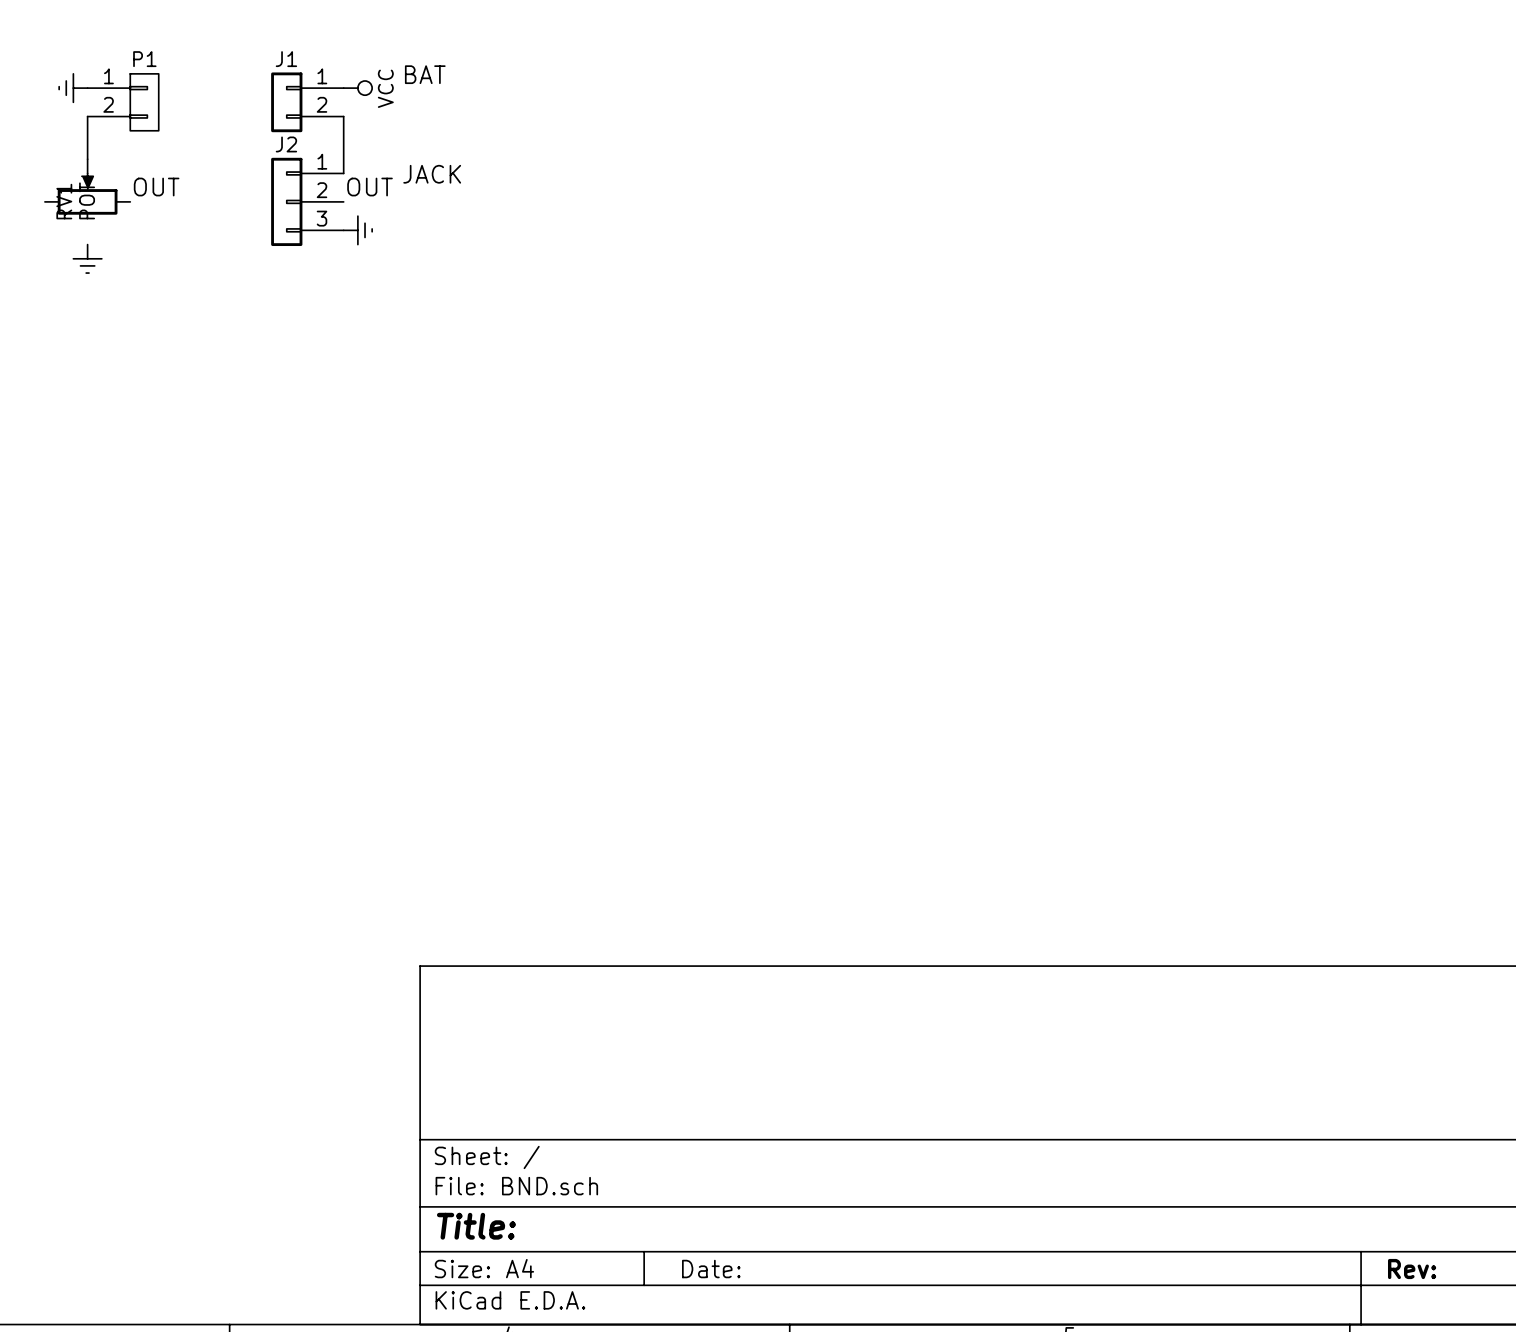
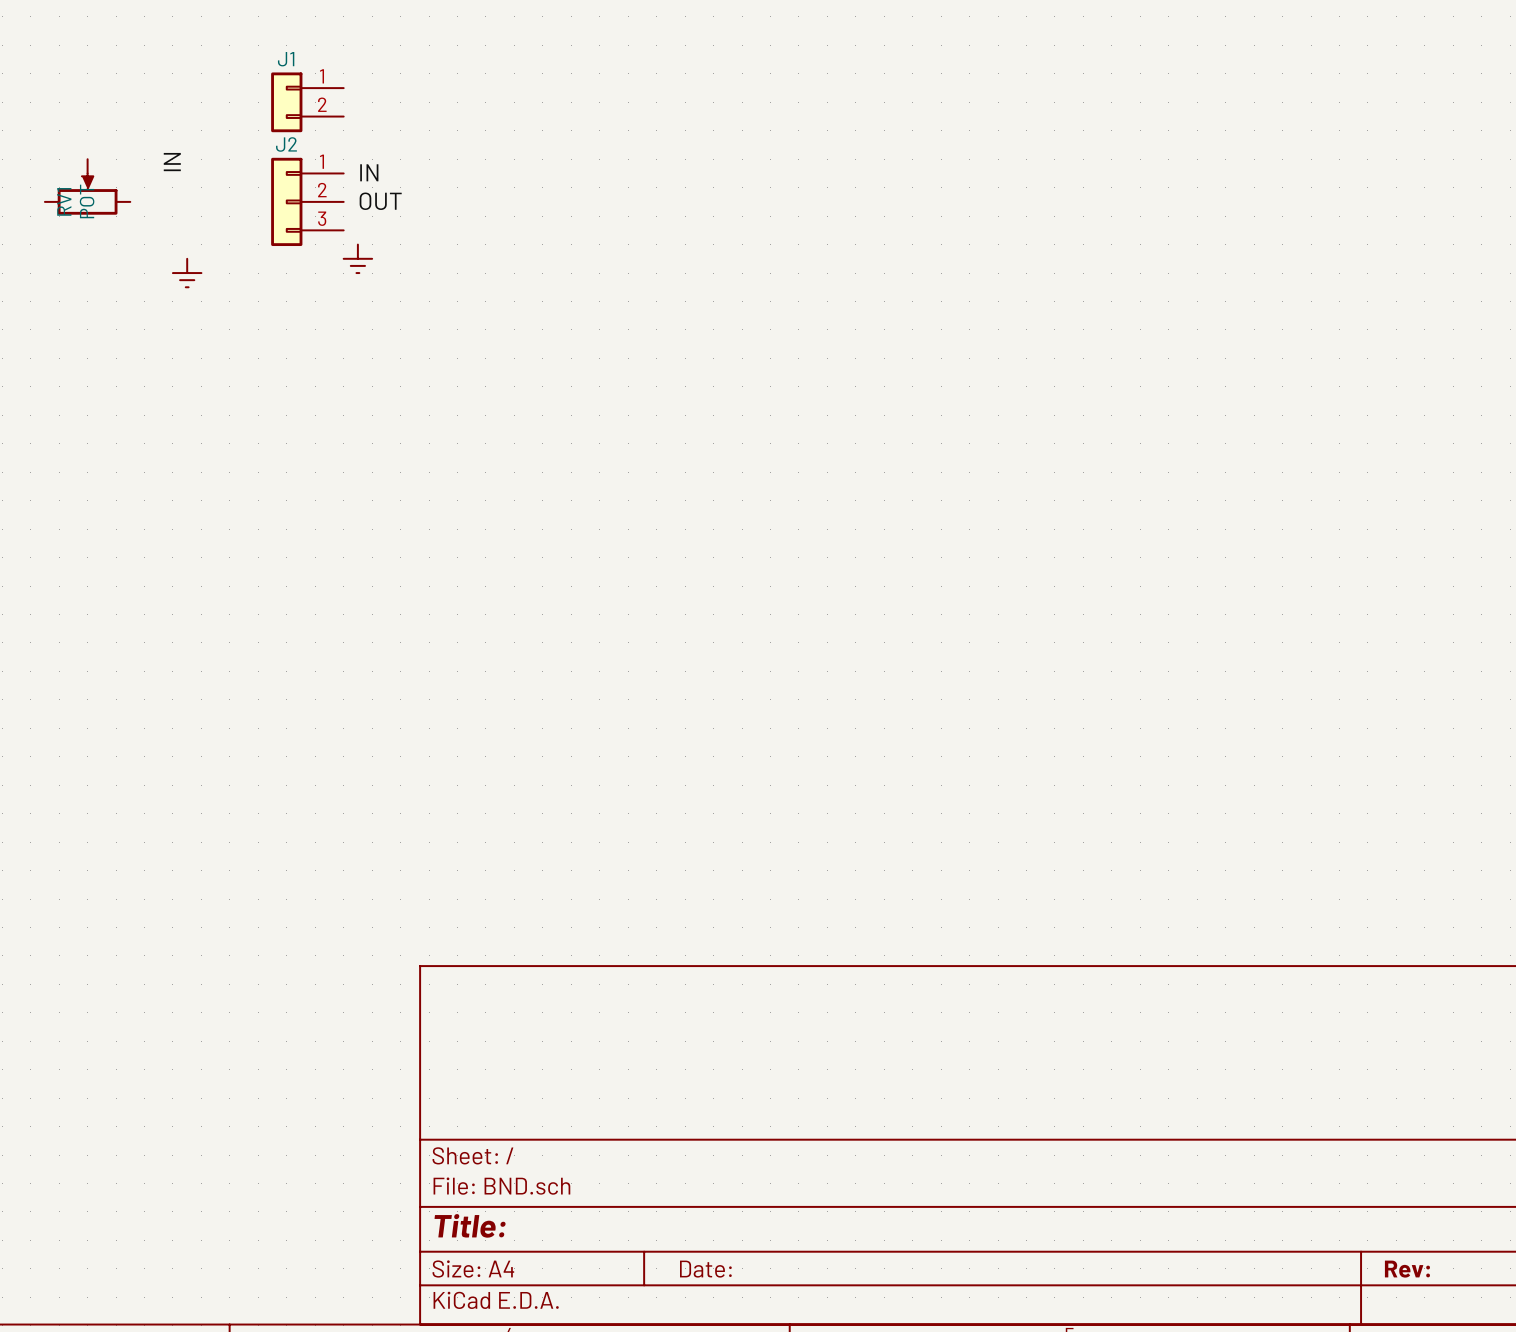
text: BAT (425, 74) -> none
power symbol: (73, 88) -> none
power symbol: VCC (357, 88) -> none
P1: (123, 102) -> none
wire: (87, 116) (87, 159) -> none
wire: (343, 116) (343, 173) -> none
label: none -> IN (172, 162)
label: none -> IN (369, 172)
text: JACK (432, 174) -> none
label: OUT (156, 187) -> none
label position: OUT (370, 187) -> OUT (380, 201)
power symbol rotation: 0° (357, 230) -> 90° clockwise (357, 258)
power symbol position: (357, 230) -> (357, 258)
power symbol: (87, 258) -> none
power symbol: none -> (187, 273)

